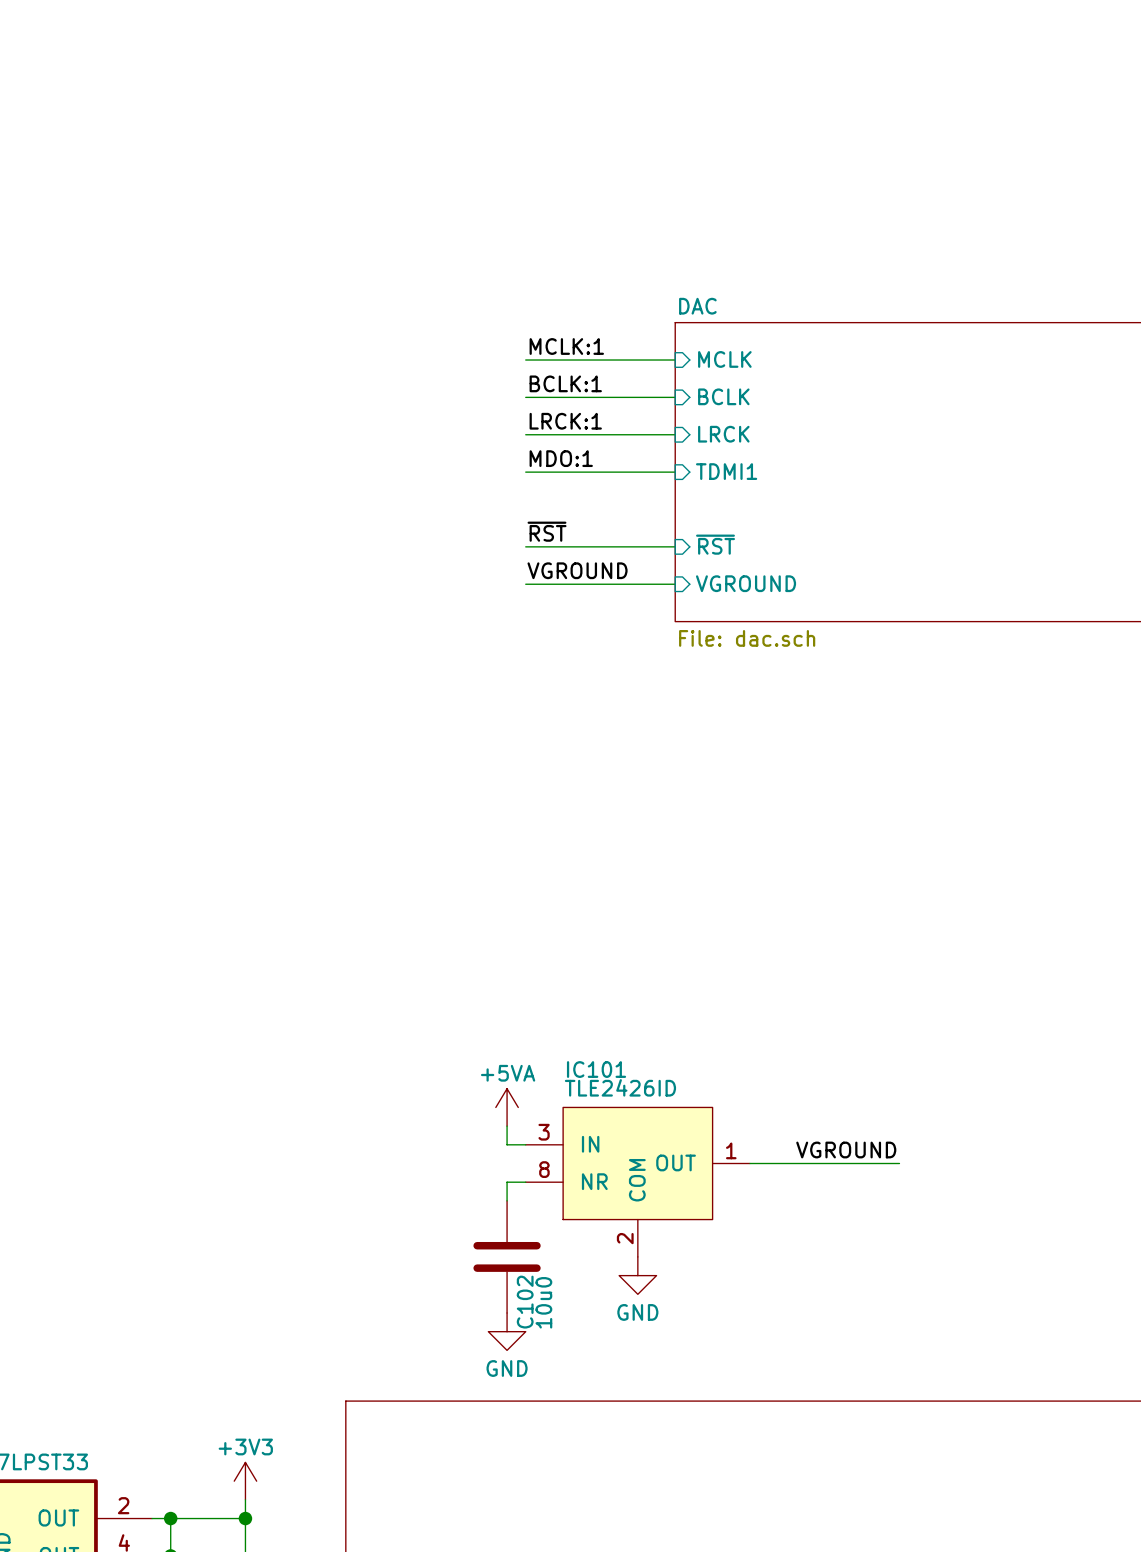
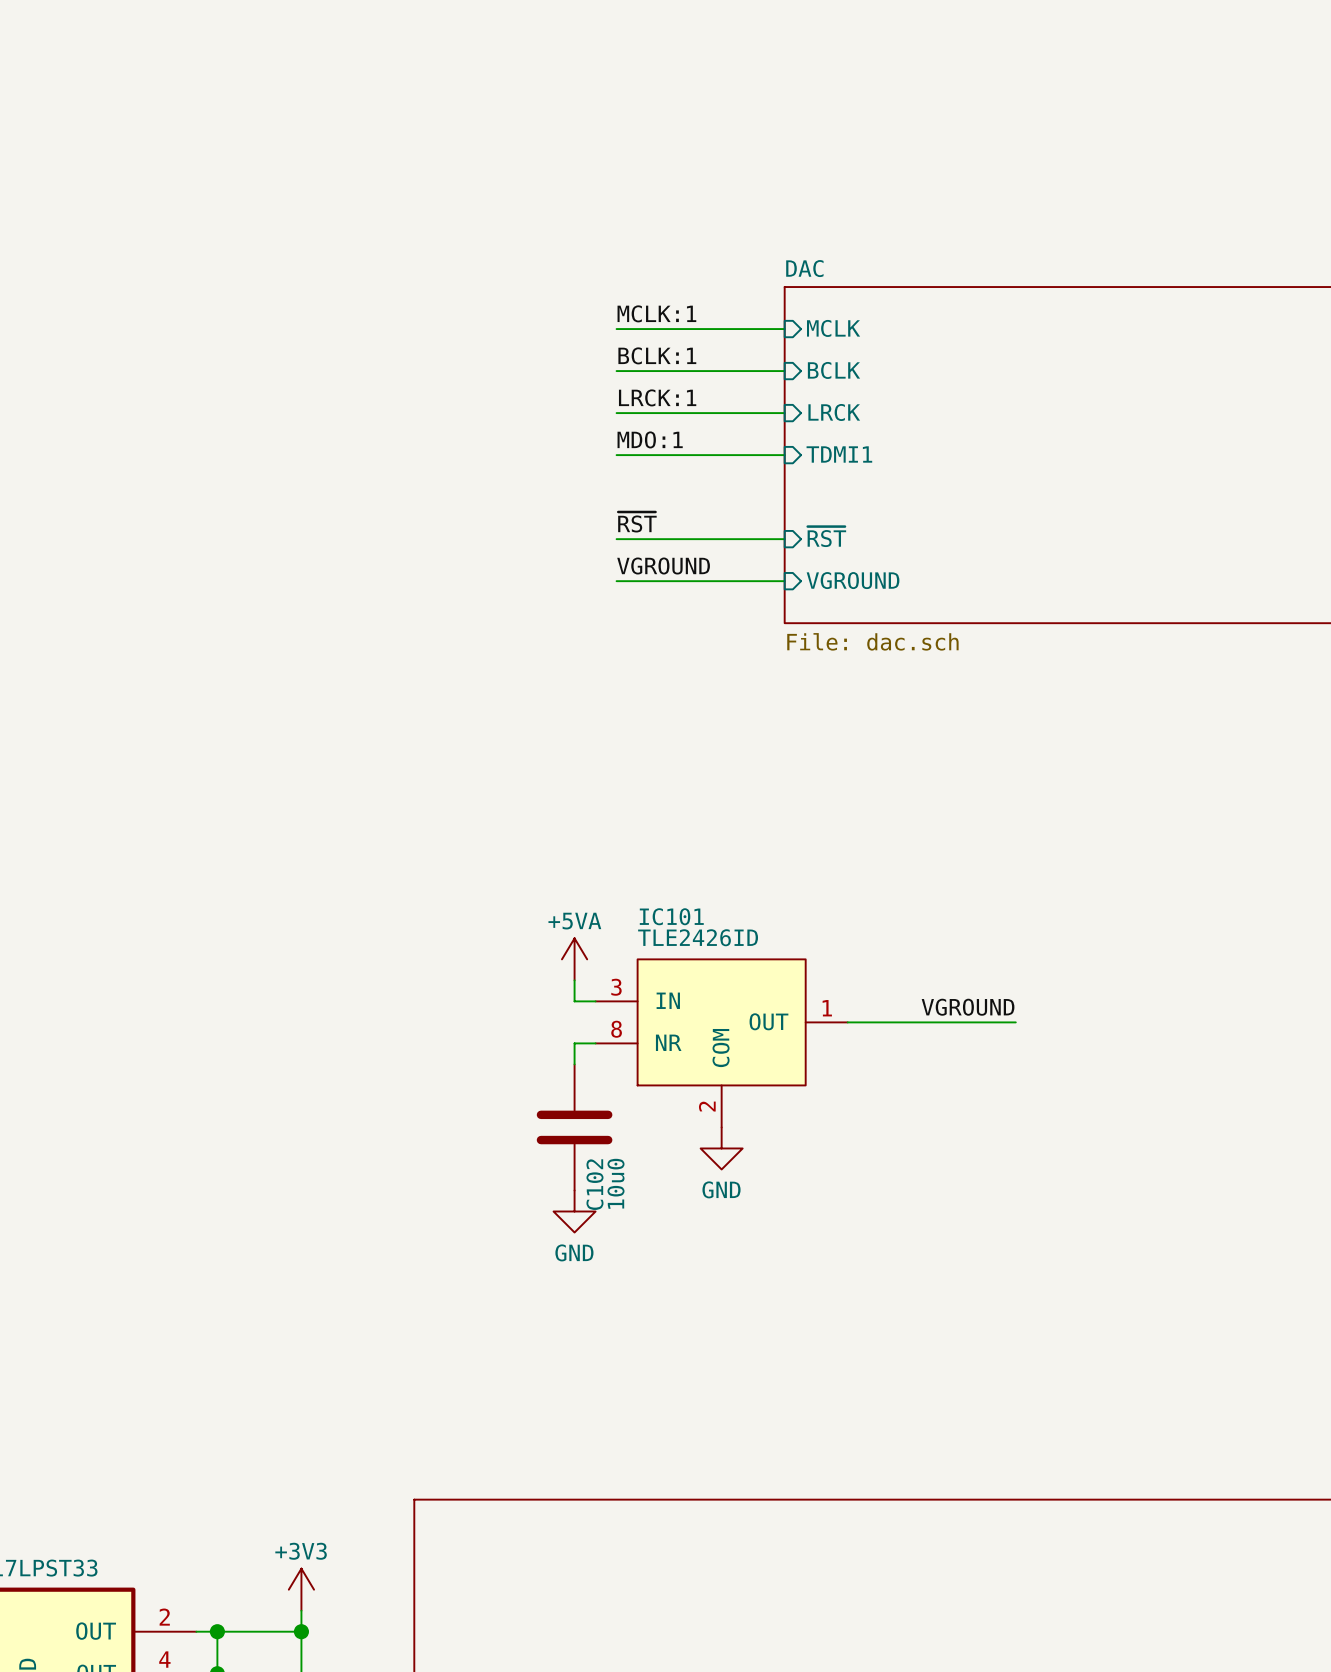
power symbol: none -> GND (721, 1148)
power symbol position: +5VA (507, 1107) -> +5VA (574, 959)
wire: (507, 1126) (507, 1144) (525, 1144) -> (574, 980) (574, 1001) (595, 1001)
power symbol: none -> GND (574, 1211)
label position: VGROUND (846, 1150) -> VGROUND (968, 1007)
wire: (749, 1163) (899, 1163) -> (847, 1022) (1015, 1022)
wire: (525, 1182) (507, 1182) (507, 1200) -> (595, 1043) (574, 1043) (574, 1064)
IC101 position: (637, 1182) -> (721, 1043)
C102 position: (507, 1256) -> (574, 1127)
power symbol: GND (637, 1275) -> none
power symbol: GND (507, 1331) -> none

